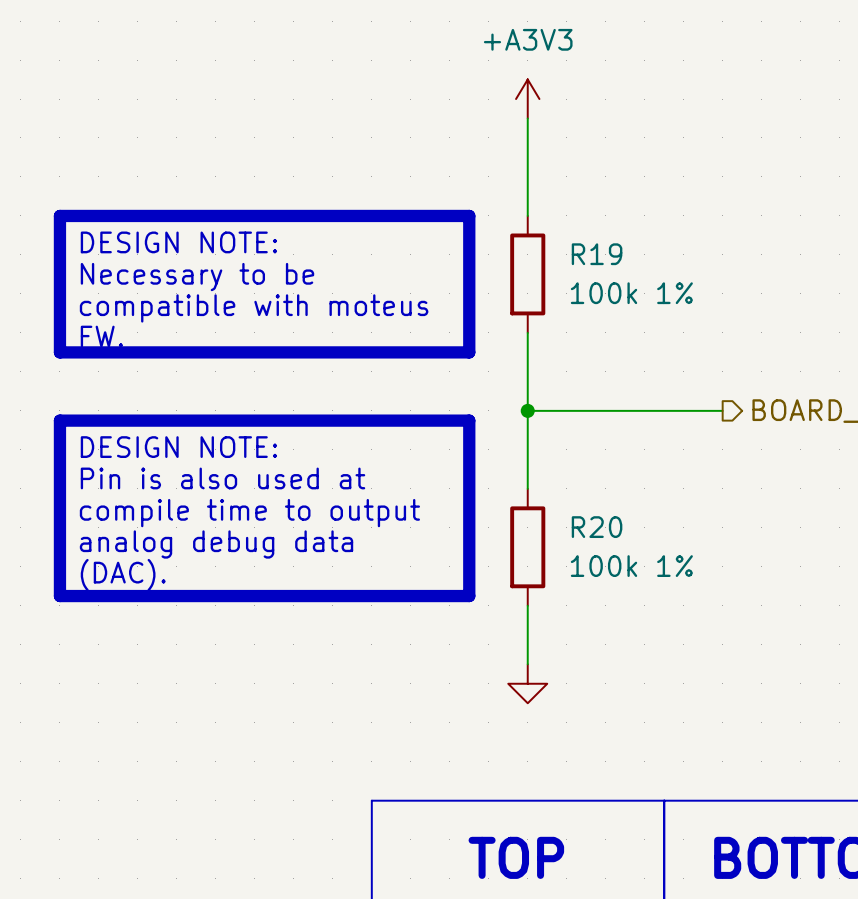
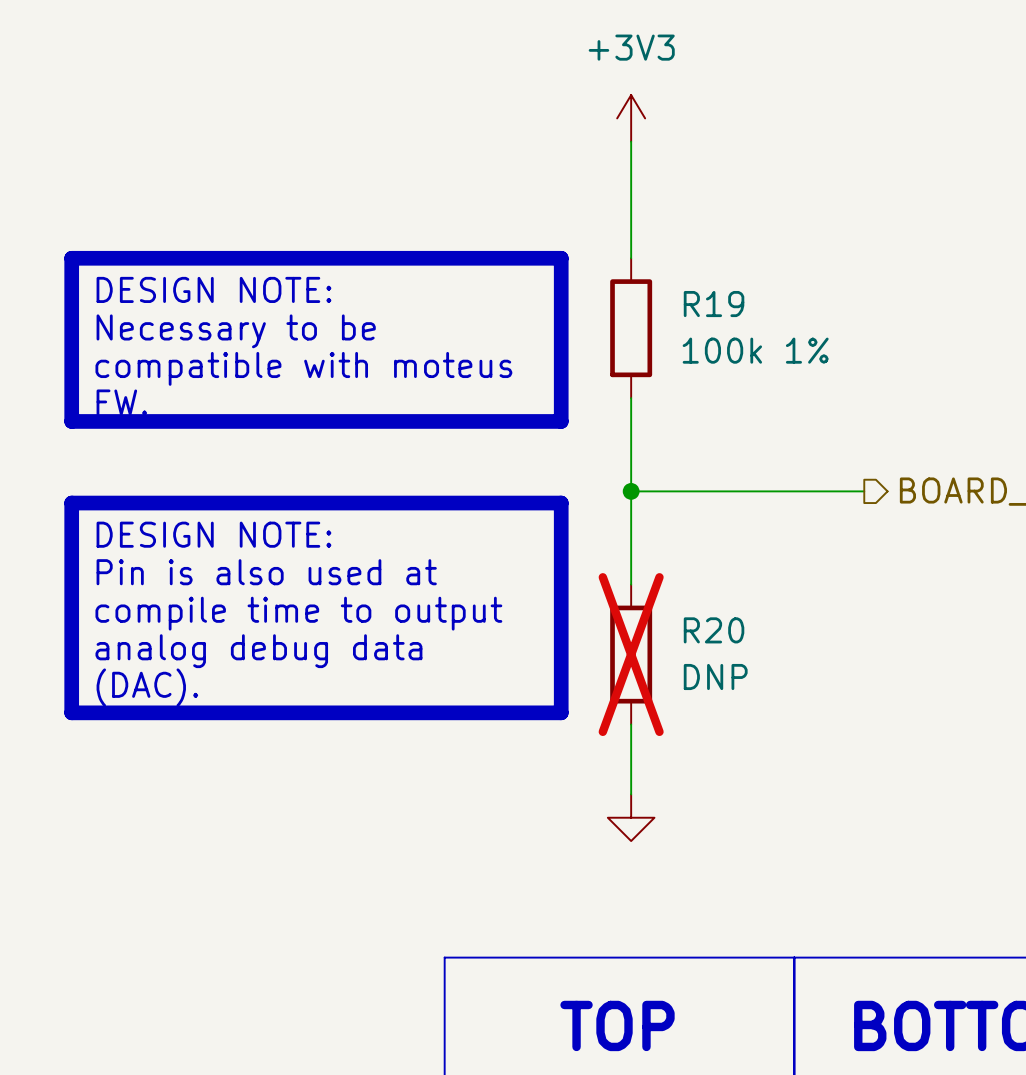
power symbol: +A3V3 (527, 99) -> +3V3 (631, 118)
R20 do-not-place cross: none -> (631, 654)
R20 value: 100k 1% (631, 566) -> DNP (715, 677)

